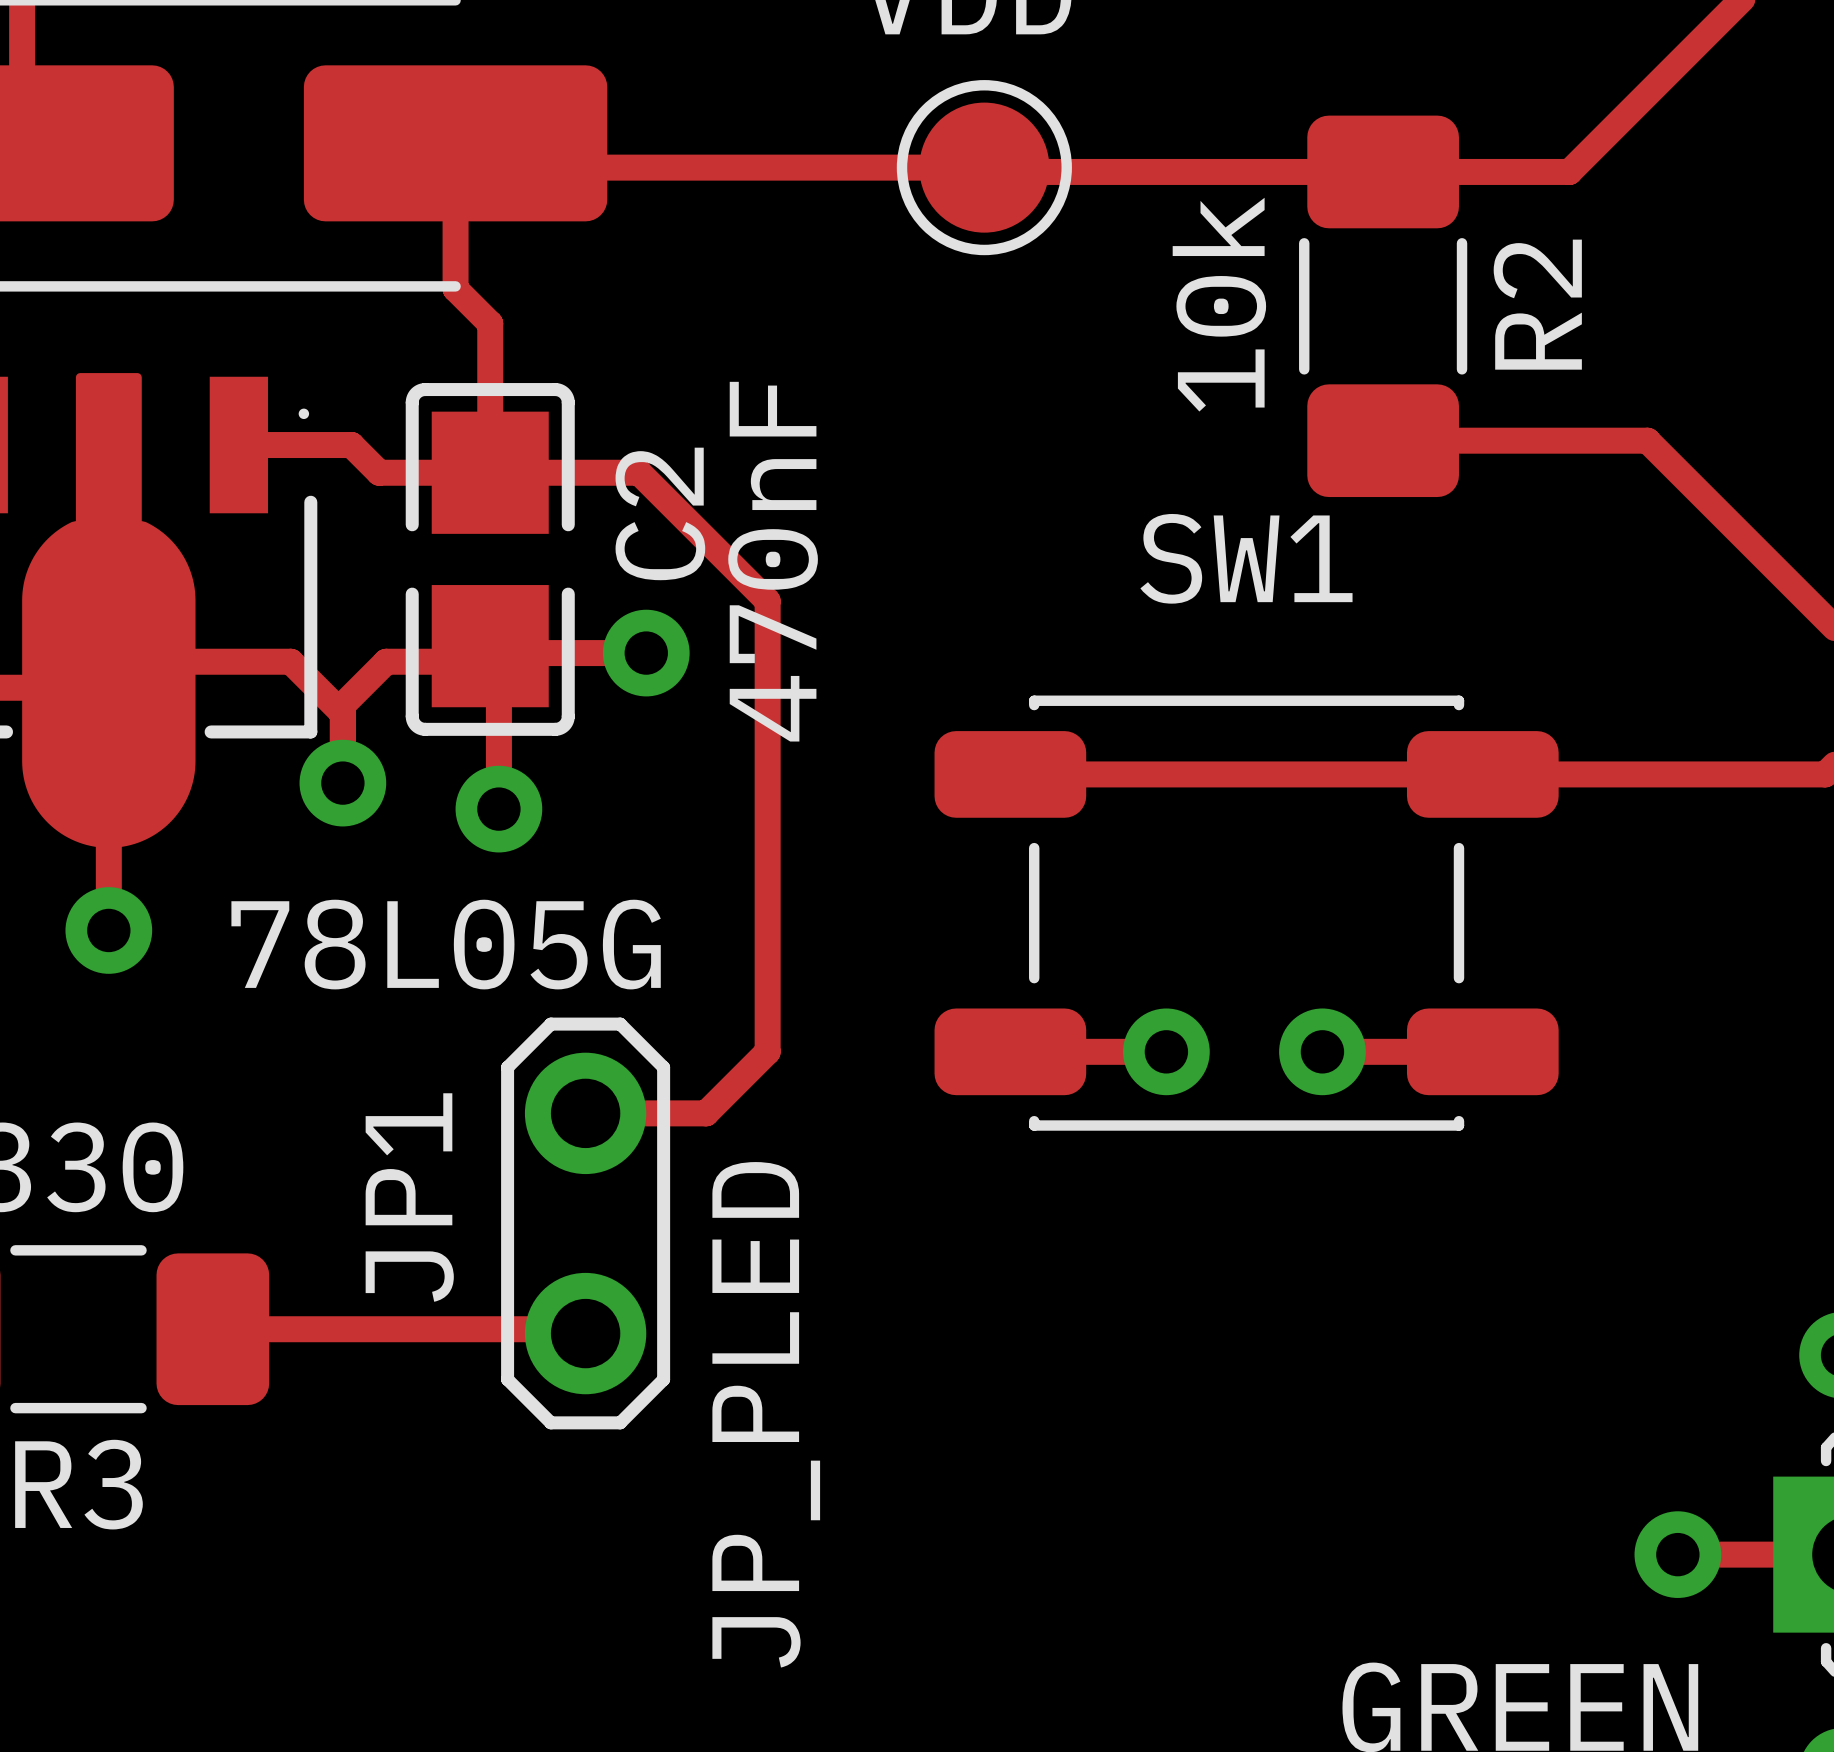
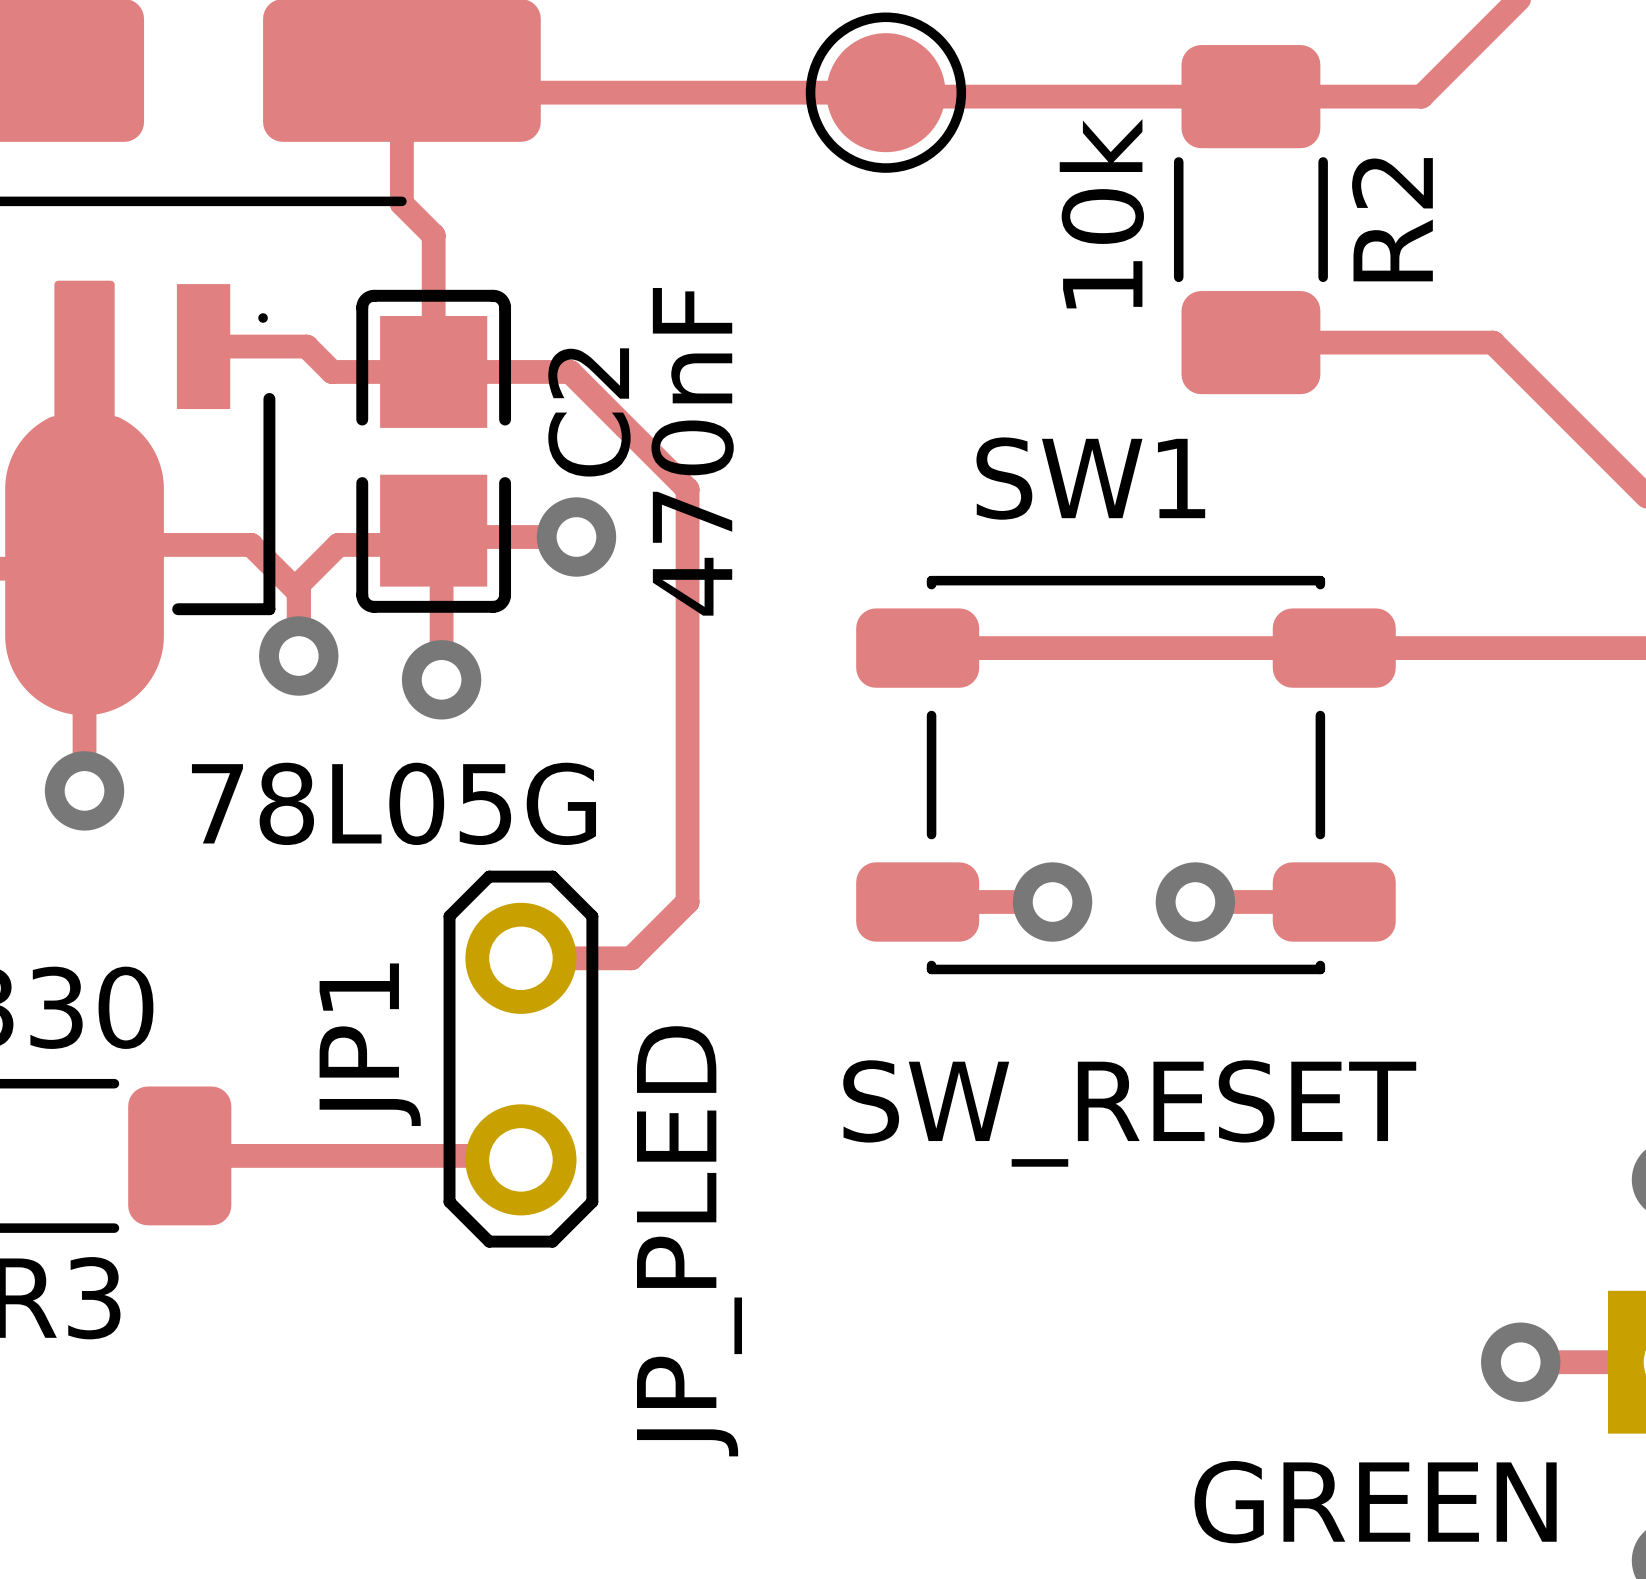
SW1 name position: SW1 (1246, 558) -> SW1 (1090, 478)
SW1 footprint: [934, 695, 1559, 1131] -> [856, 575, 1396, 975]
SW1 value: none -> SW_RESET (1129, 1113)

